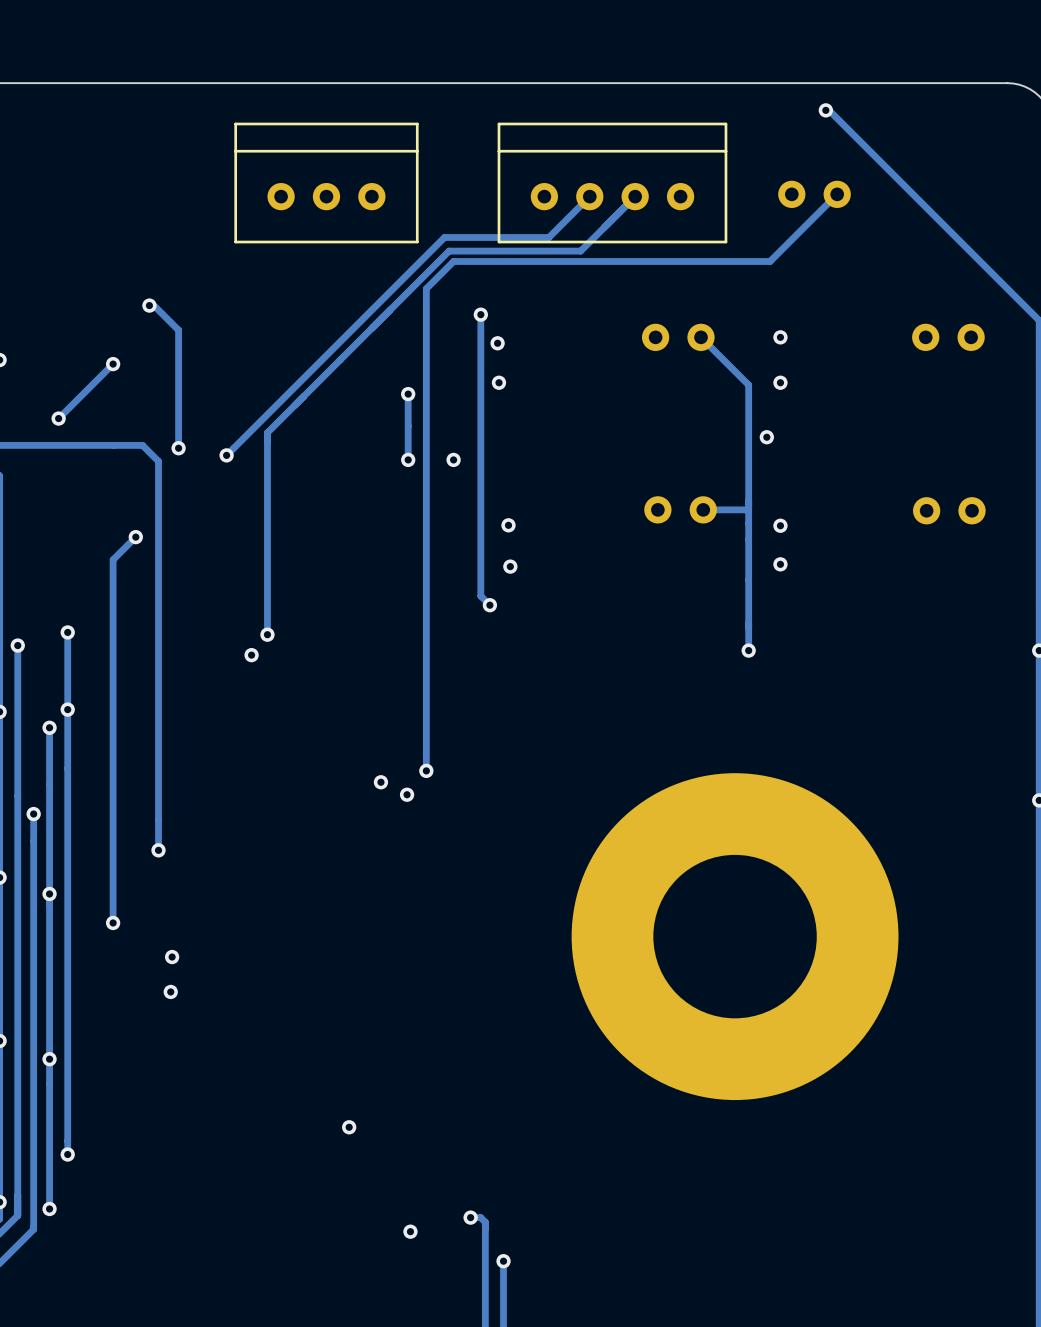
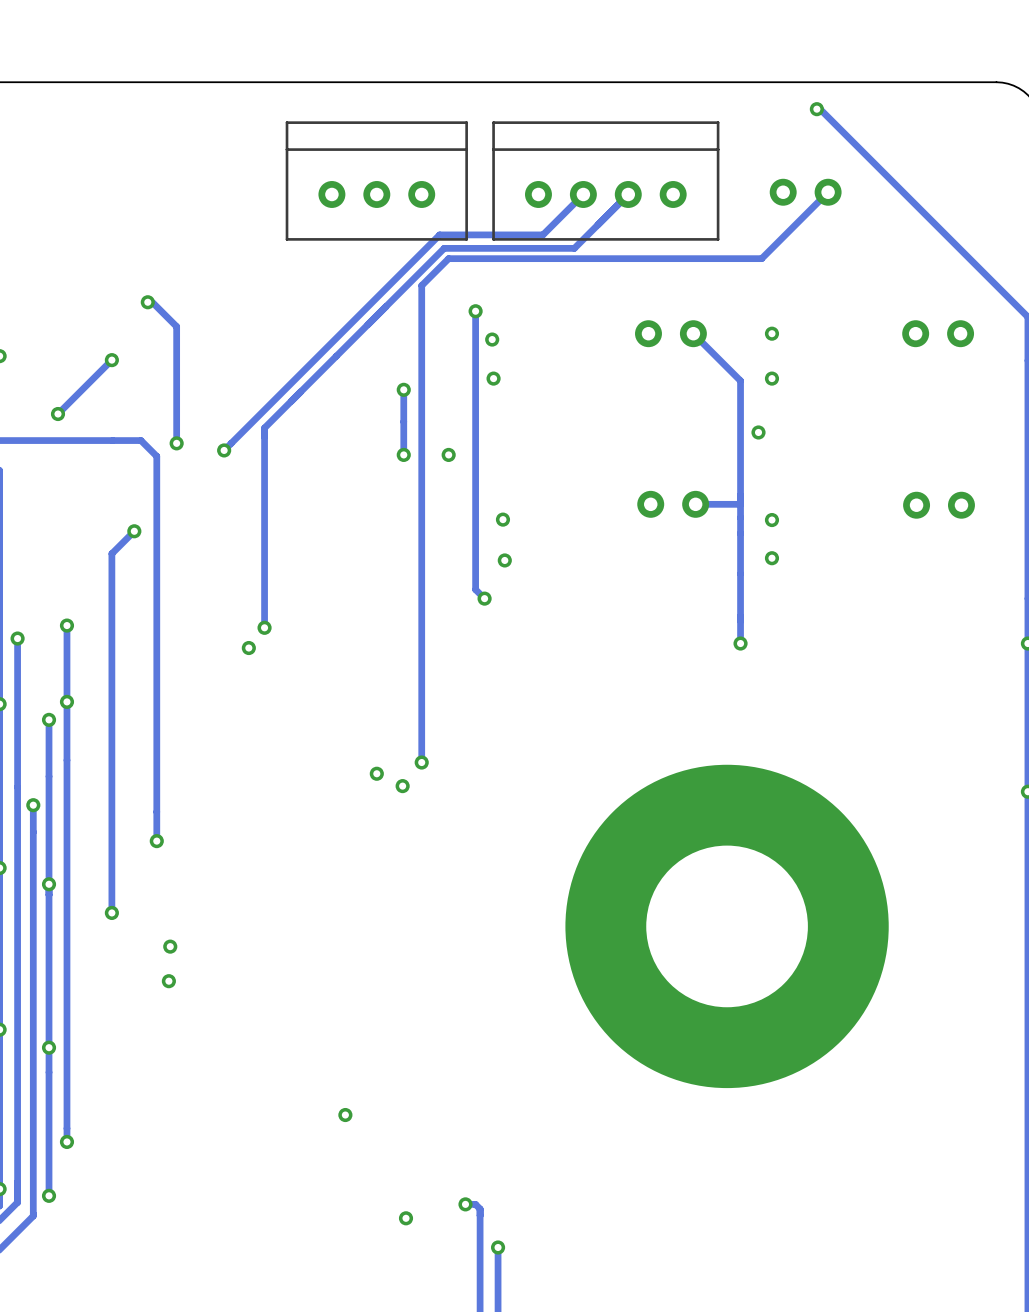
part position: (326, 183) -> (376, 181)

